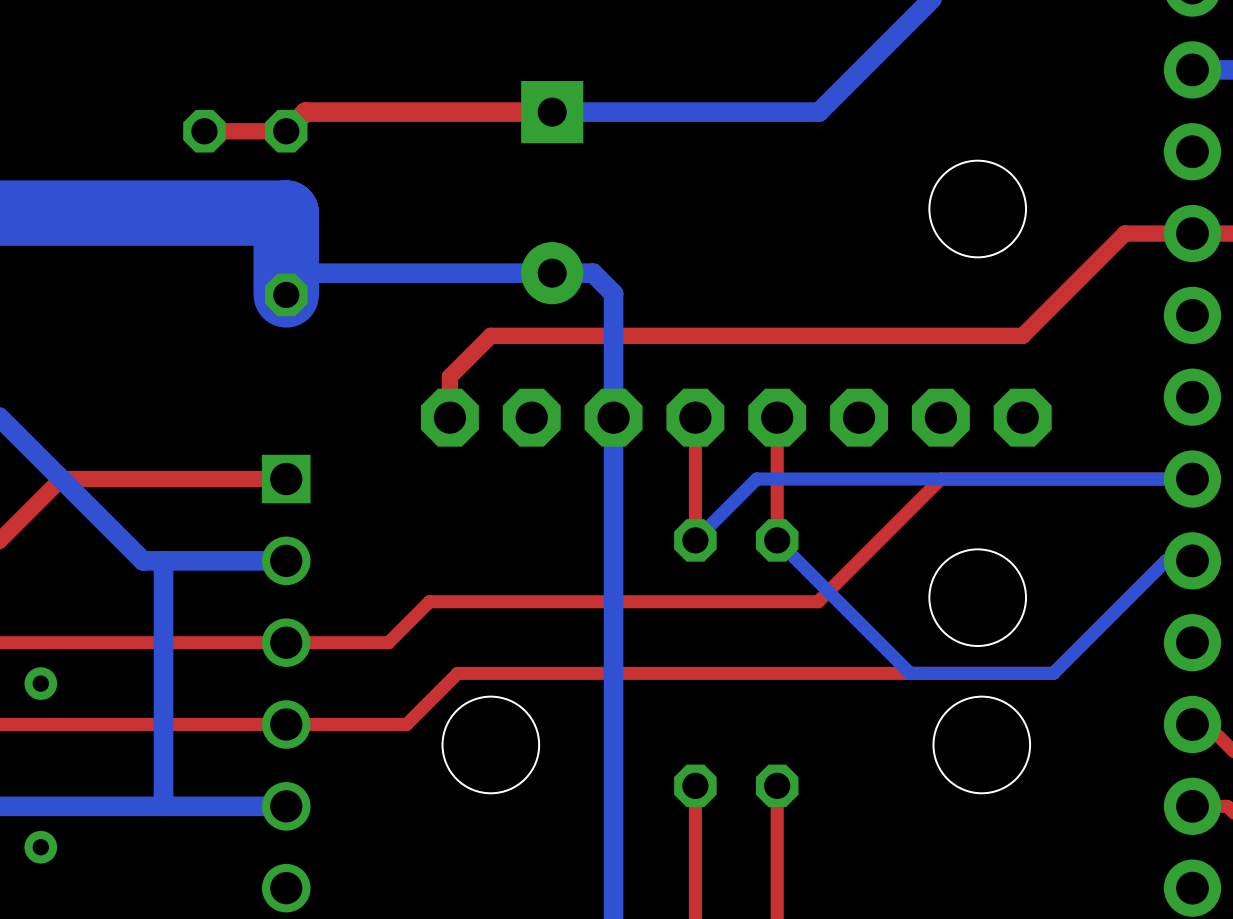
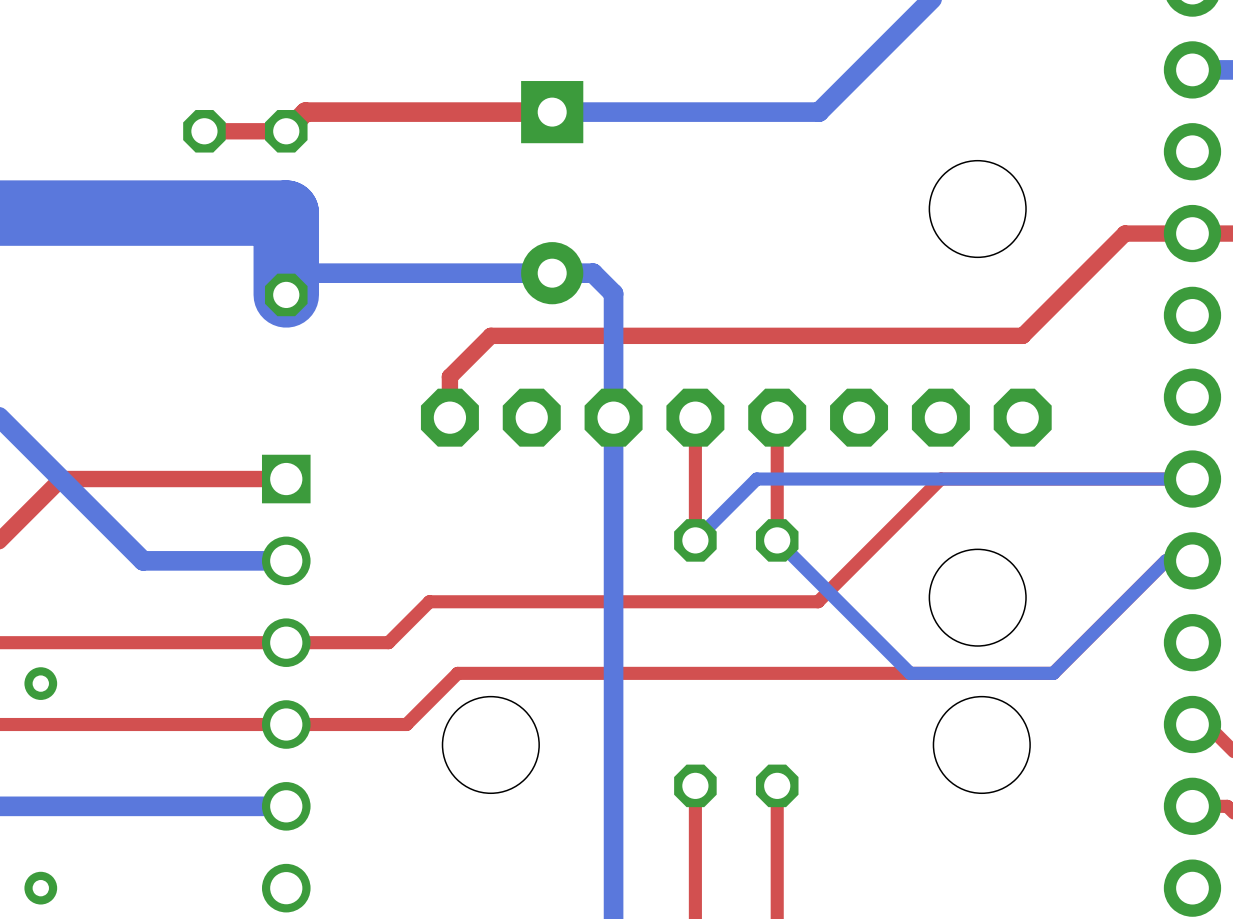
bottom track: (163, 560) (163, 806) -> none
via position: (40, 847) -> (40, 888)

